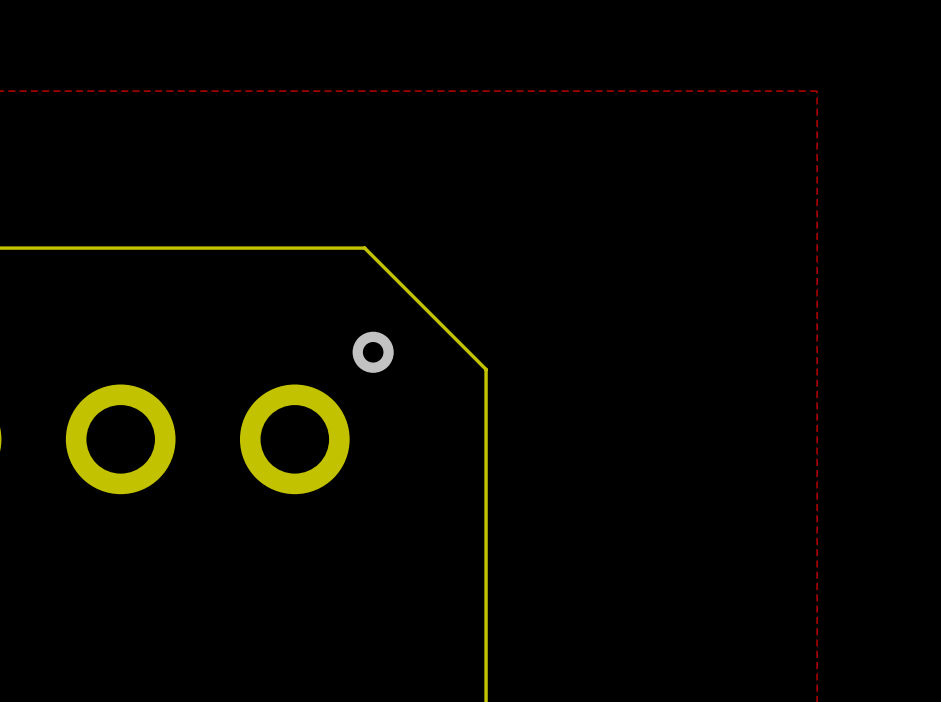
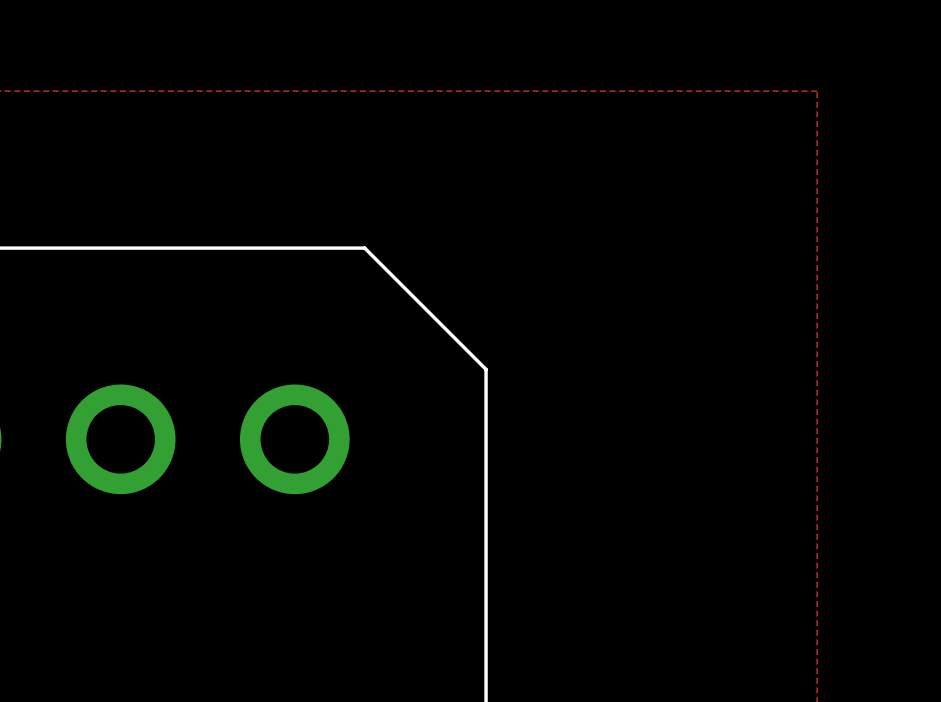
via: (373, 352) -> none

